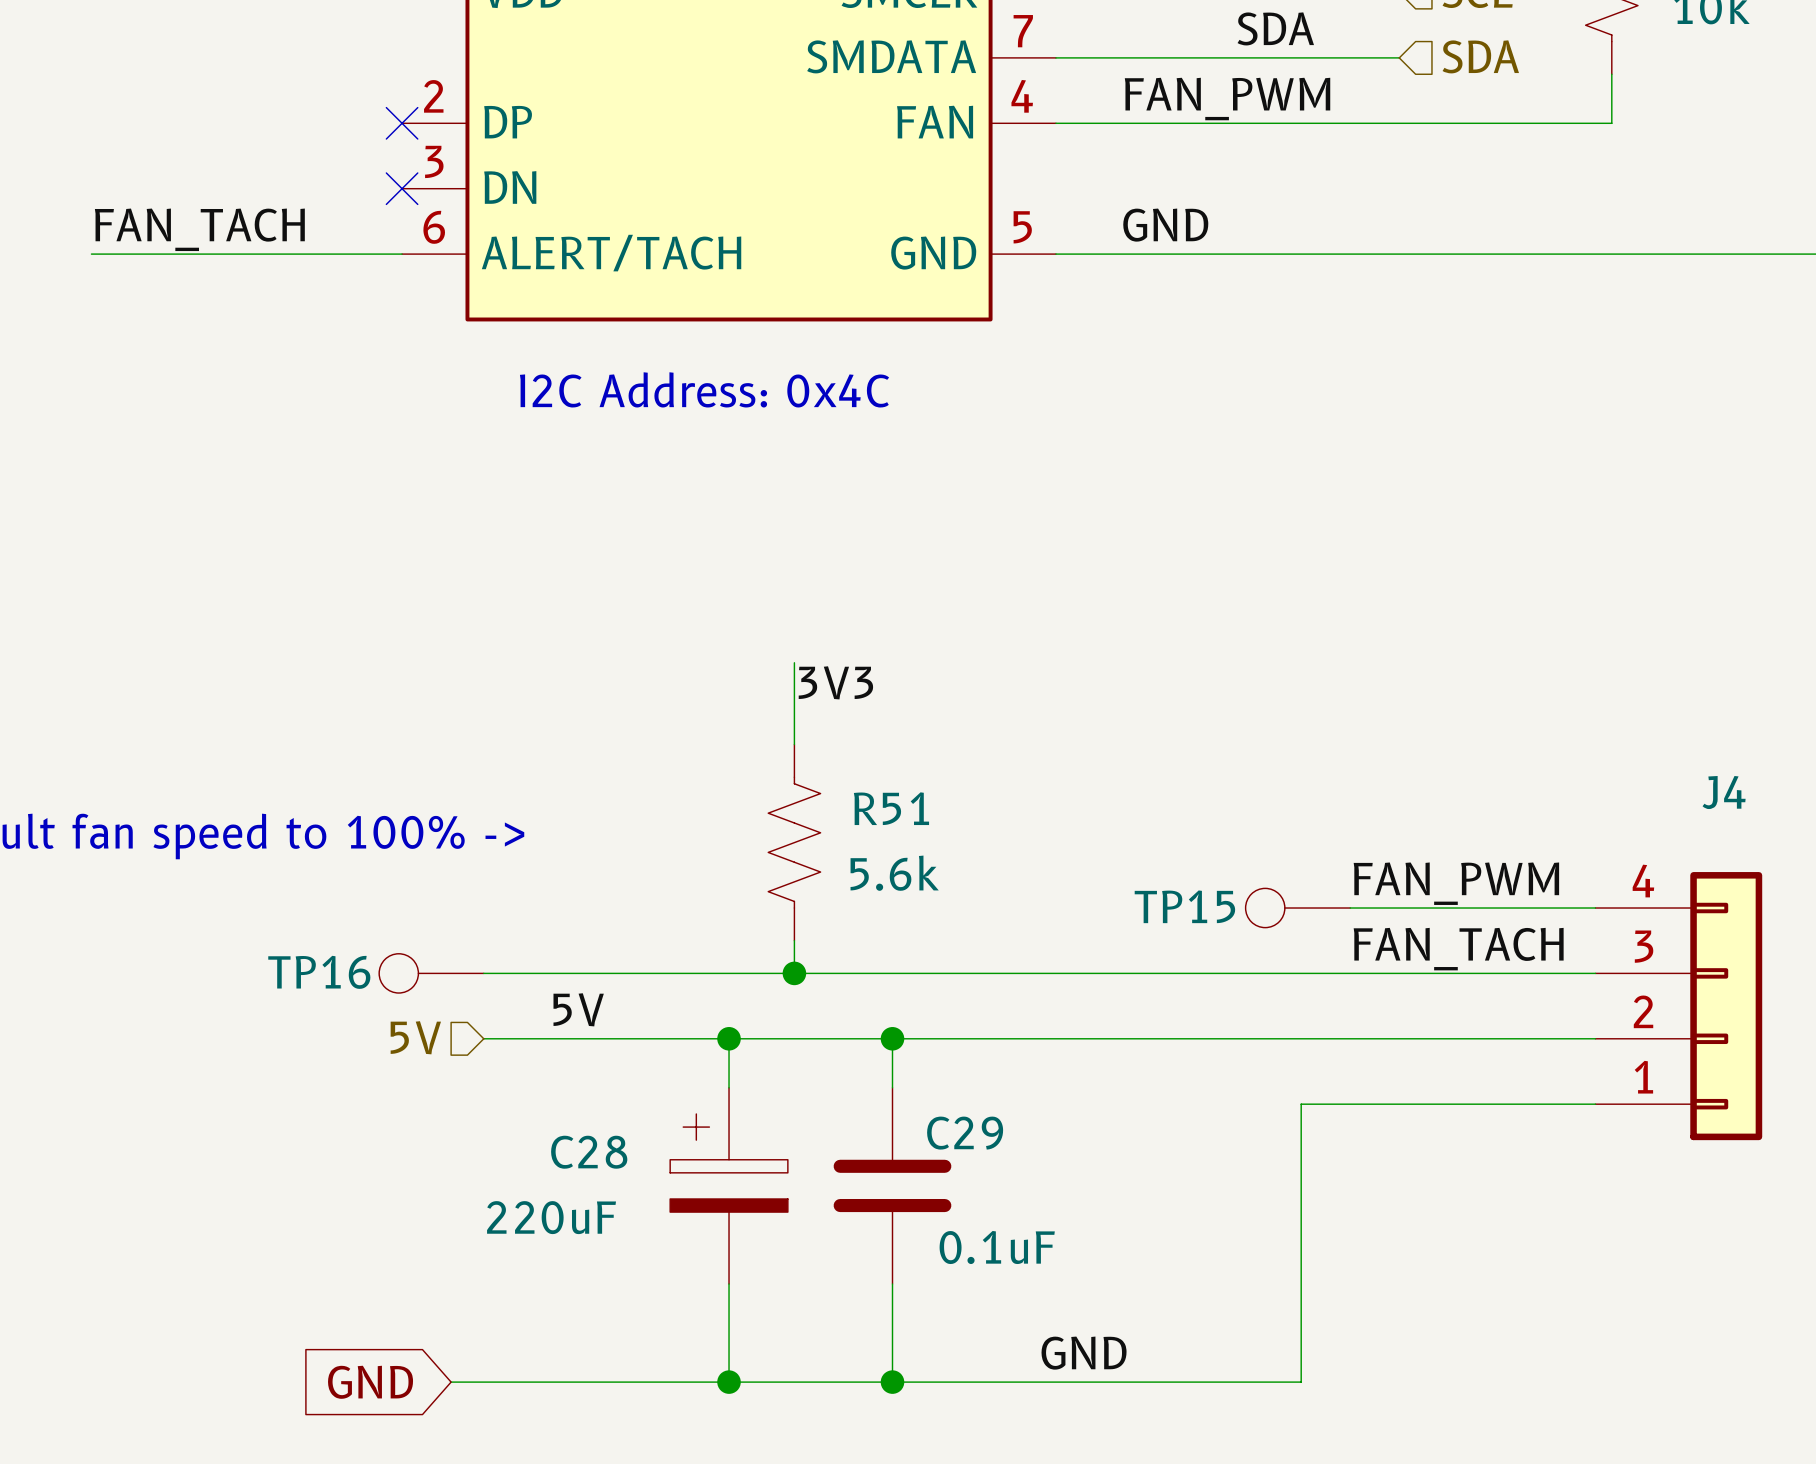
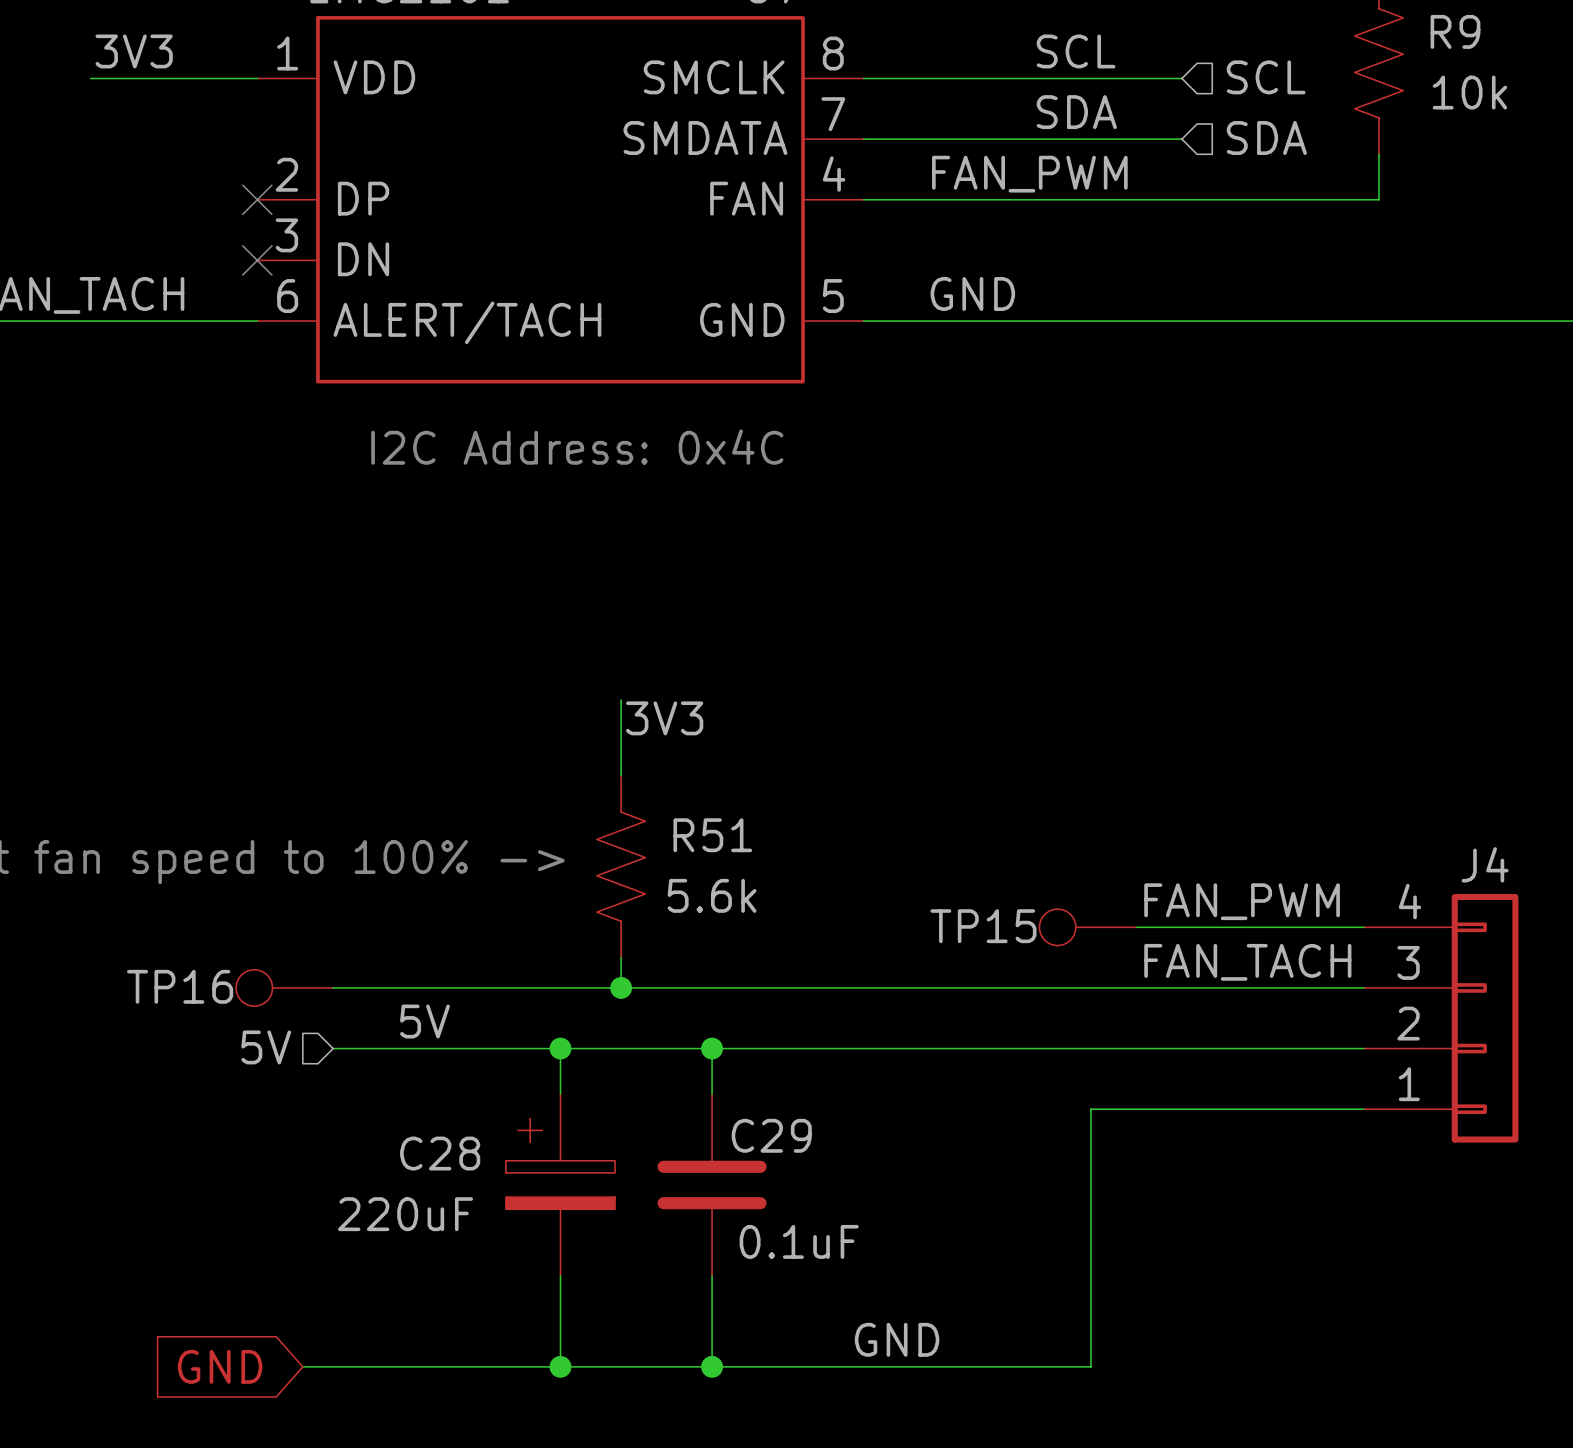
J4 name position: J4 (1724, 792) -> J4 (1485, 864)

